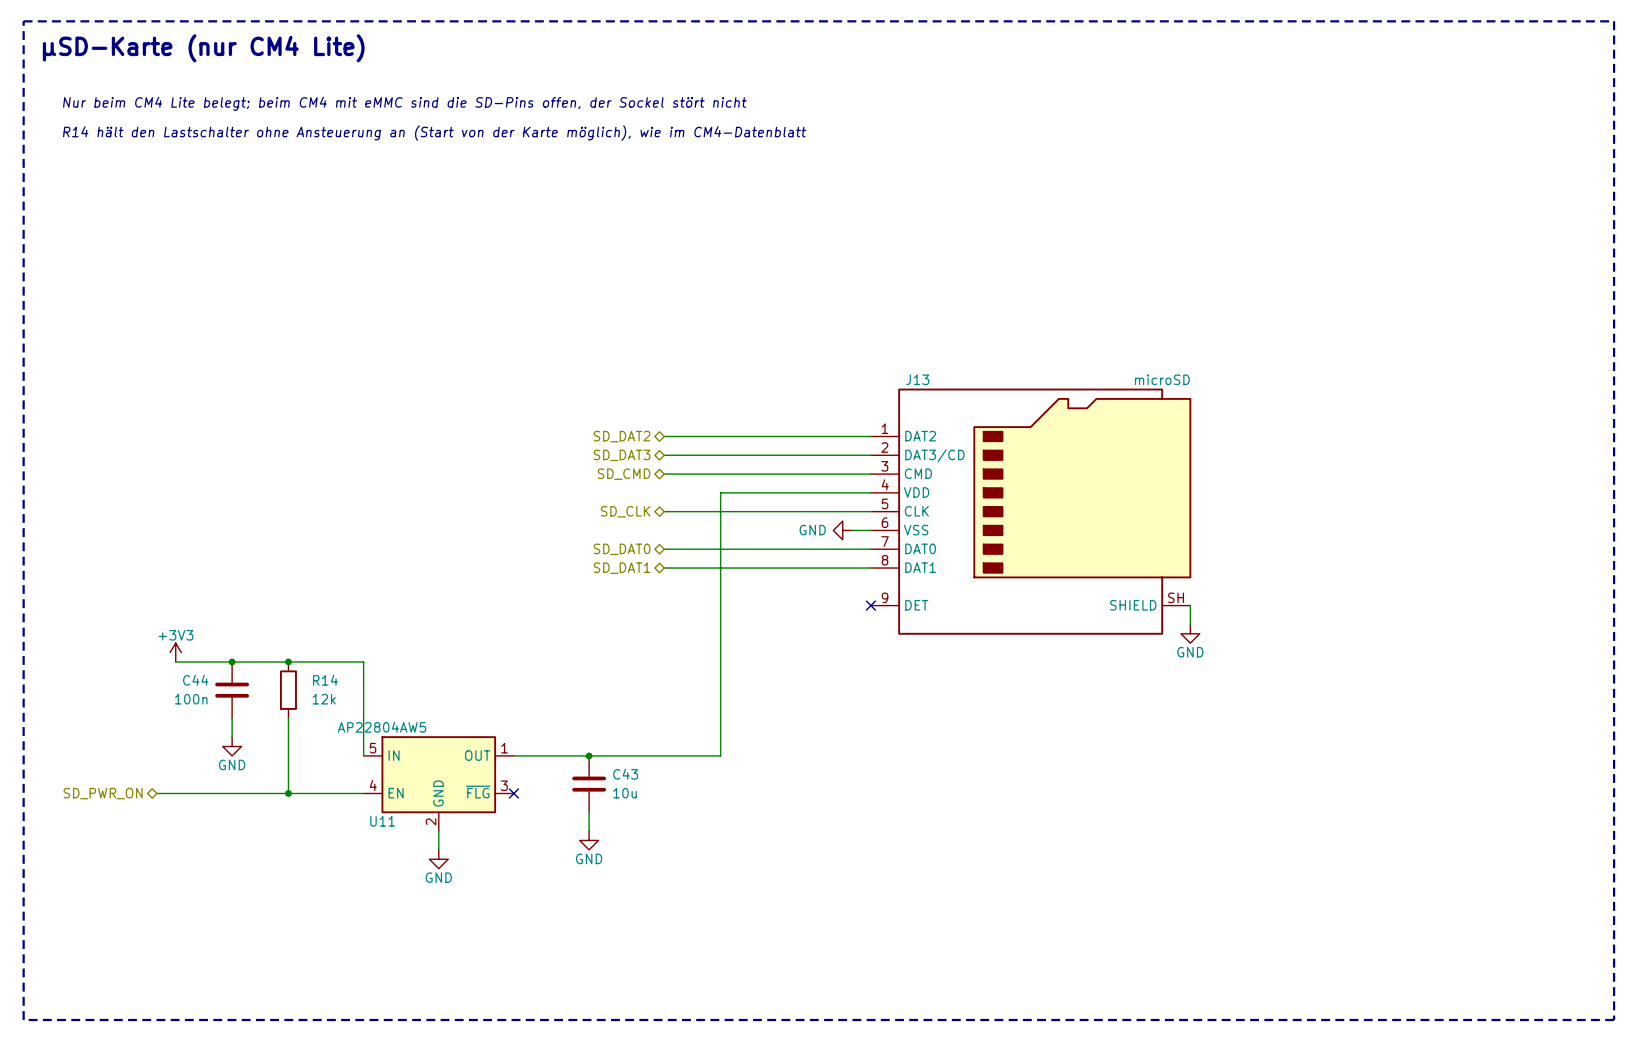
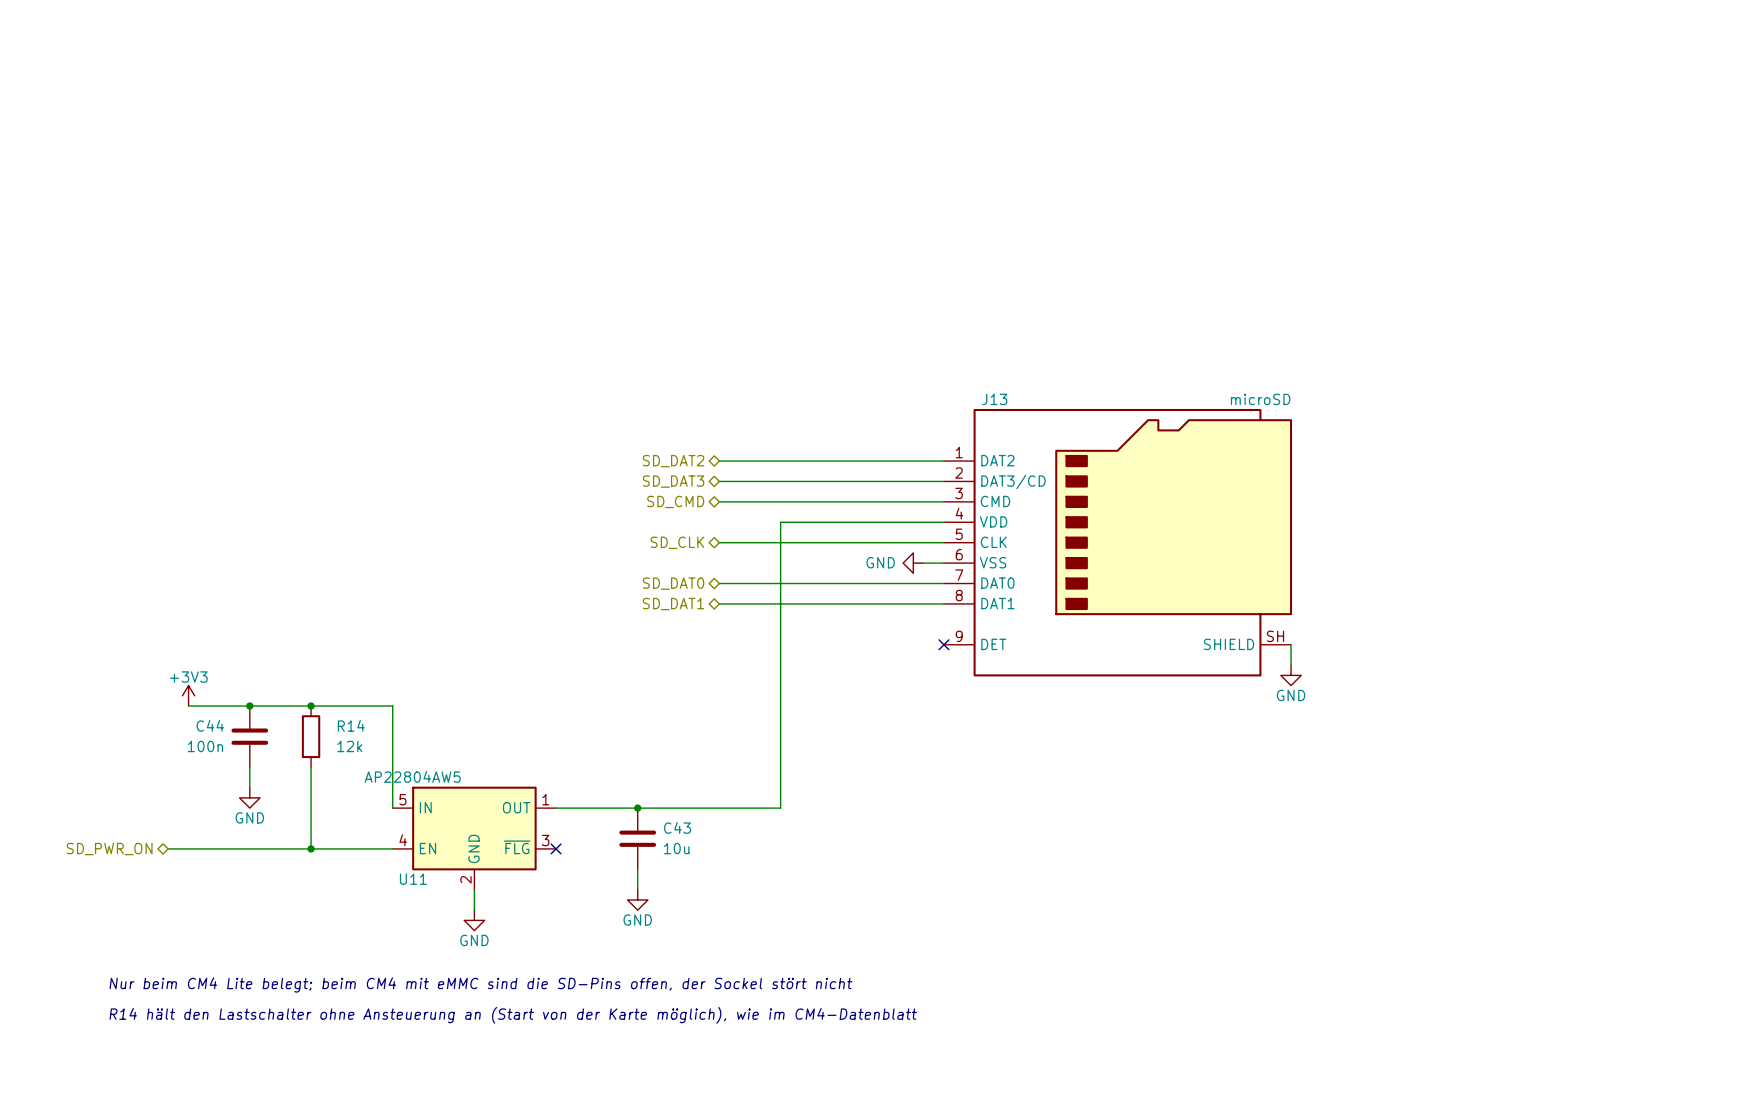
line: (23, 21) (1614, 21) (1614, 1020) (23, 1020) (23, 21) -> none
text: µSD-Karte (nur CM4 Lite) (203, 48) -> none
text: Nur beim CM4 Lite belegt; beim CM4 mit eMMC sind die SD-Pins offen, der Sockel stört nicht (404, 103) -> none
text: R14 hält den Lastschalter ohne Ansteuerung an (Start von der Karte möglich), wie im CM4-Datenblatt (434, 133) -> none
text: none -> Nur beim CM4 Lite belegt; beim CM4 mit eMMC sind die SD-Pins offen, der Sockel stört nicht (480, 984)
text: none -> R14 hält den Lastschalter ohne Ansteuerung an (Start von der Karte möglich), wie im CM4-Datenblatt (513, 1015)

